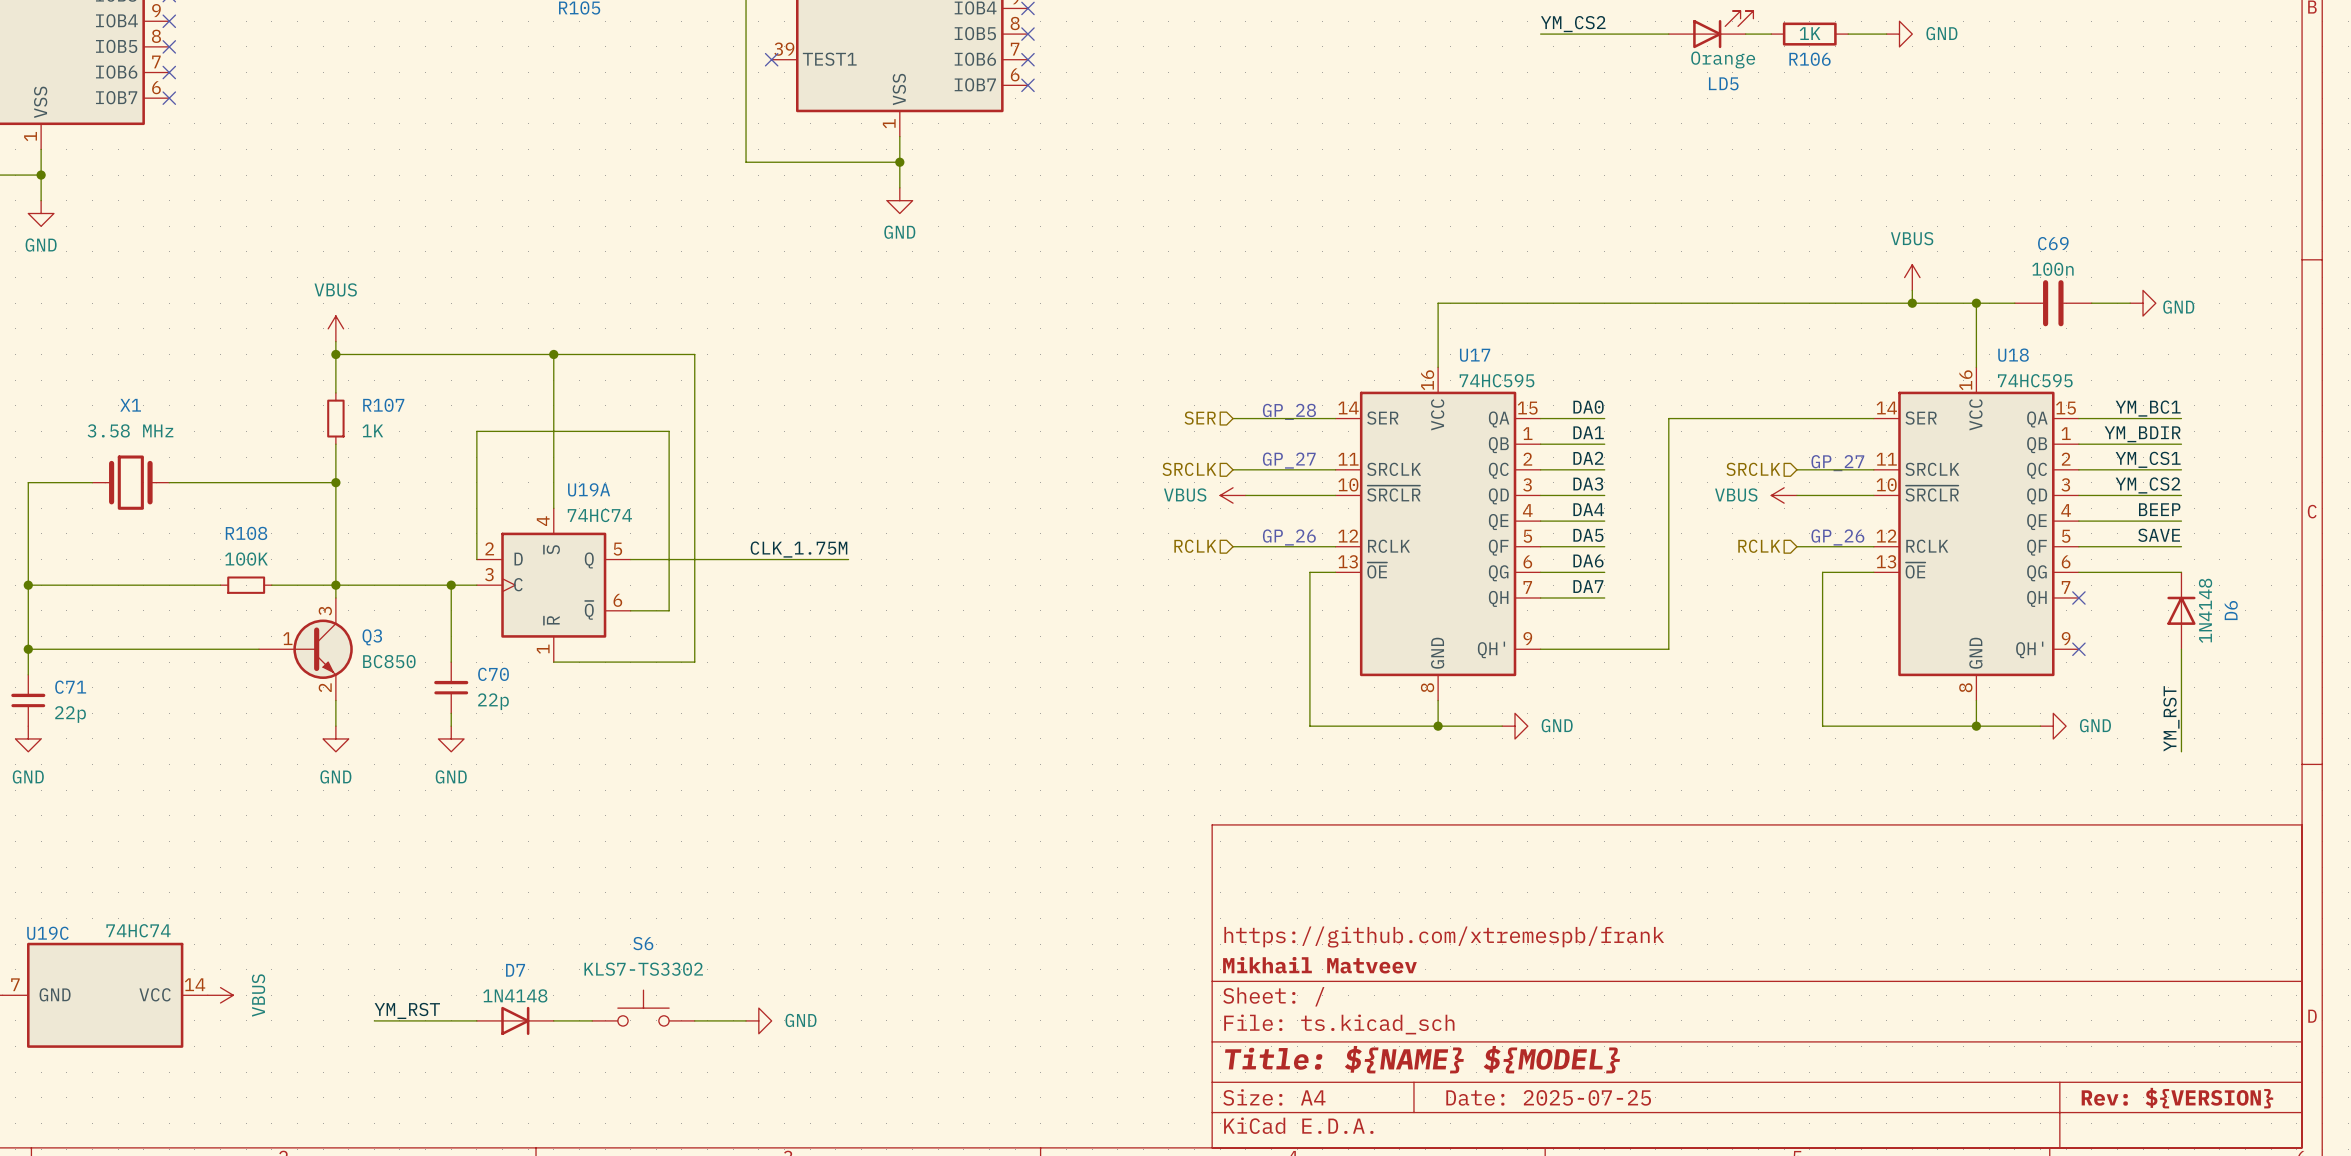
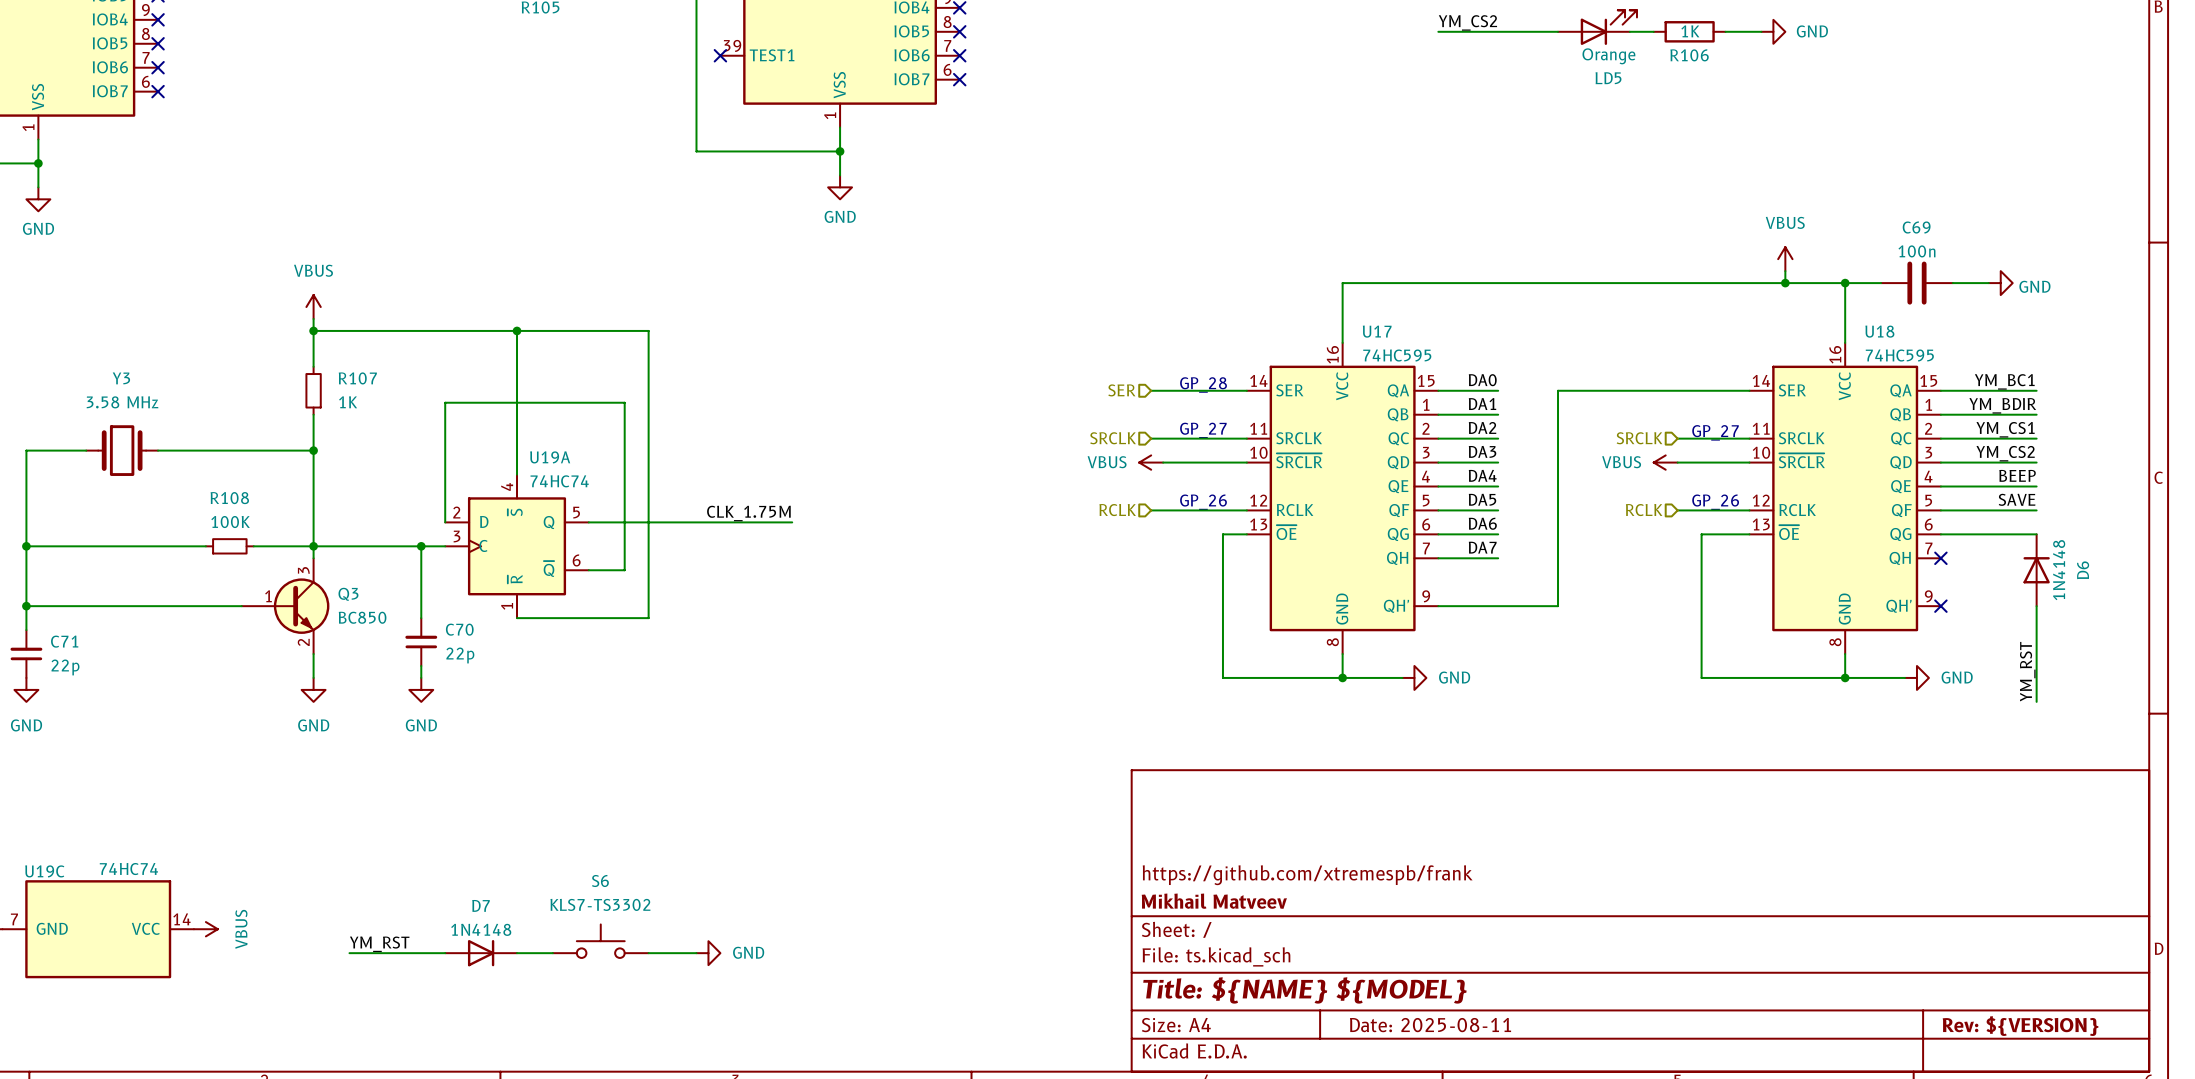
X1 name: X1 (130, 405) -> Y3 (121, 378)
title block: Date: 2025-07-25 (1548, 1097) -> Date: 2025-08-11 (1430, 1025)

